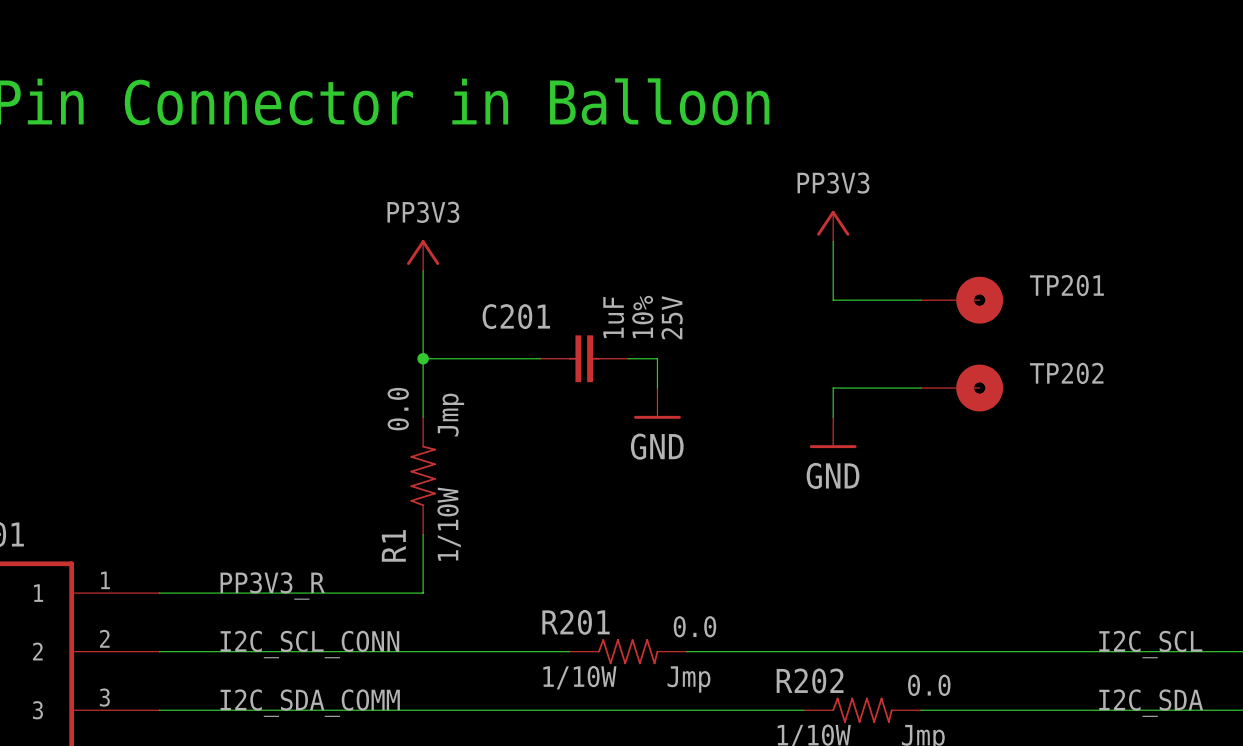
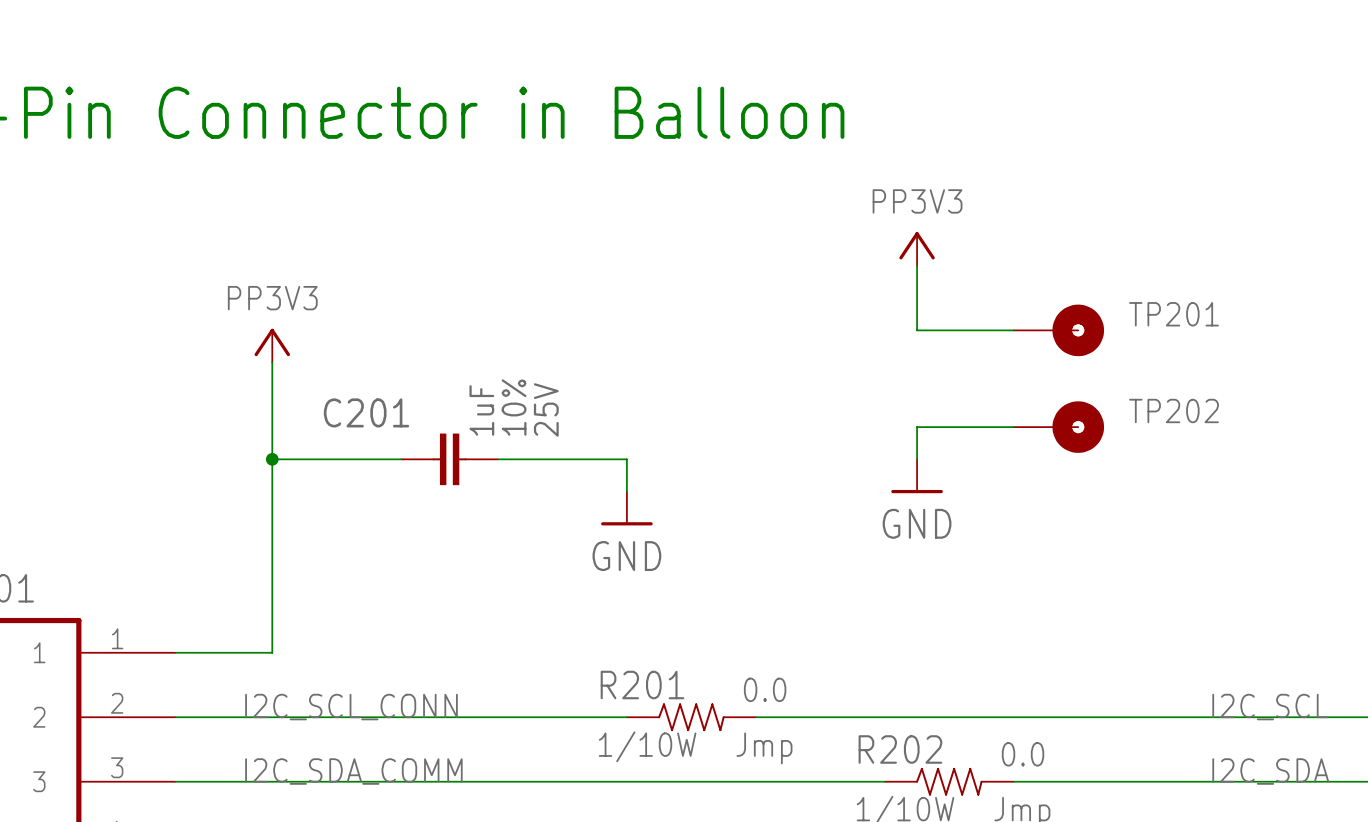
power symbol position: PP3V3 (423, 255) -> PP3V3 (272, 345)
wire: (423, 270) (423, 417) -> none
wire: (423, 358) (540, 358) -> (272, 459) (401, 459)
junction: (423, 358) -> none
C201 position: (584, 358) -> (449, 459)
wire: (628, 358) (657, 358) (657, 388) -> none
power symbol position: GND (657, 403) -> GND (626, 508)
junction: none -> (272, 459)
wire: none -> (497, 459) (626, 459) (626, 491)
R1: 0.0 (423, 475) -> none
wire: (423, 534) (423, 593) (247, 593) -> (272, 362) (272, 652)
label: PP3V3_R (272, 585) -> none

